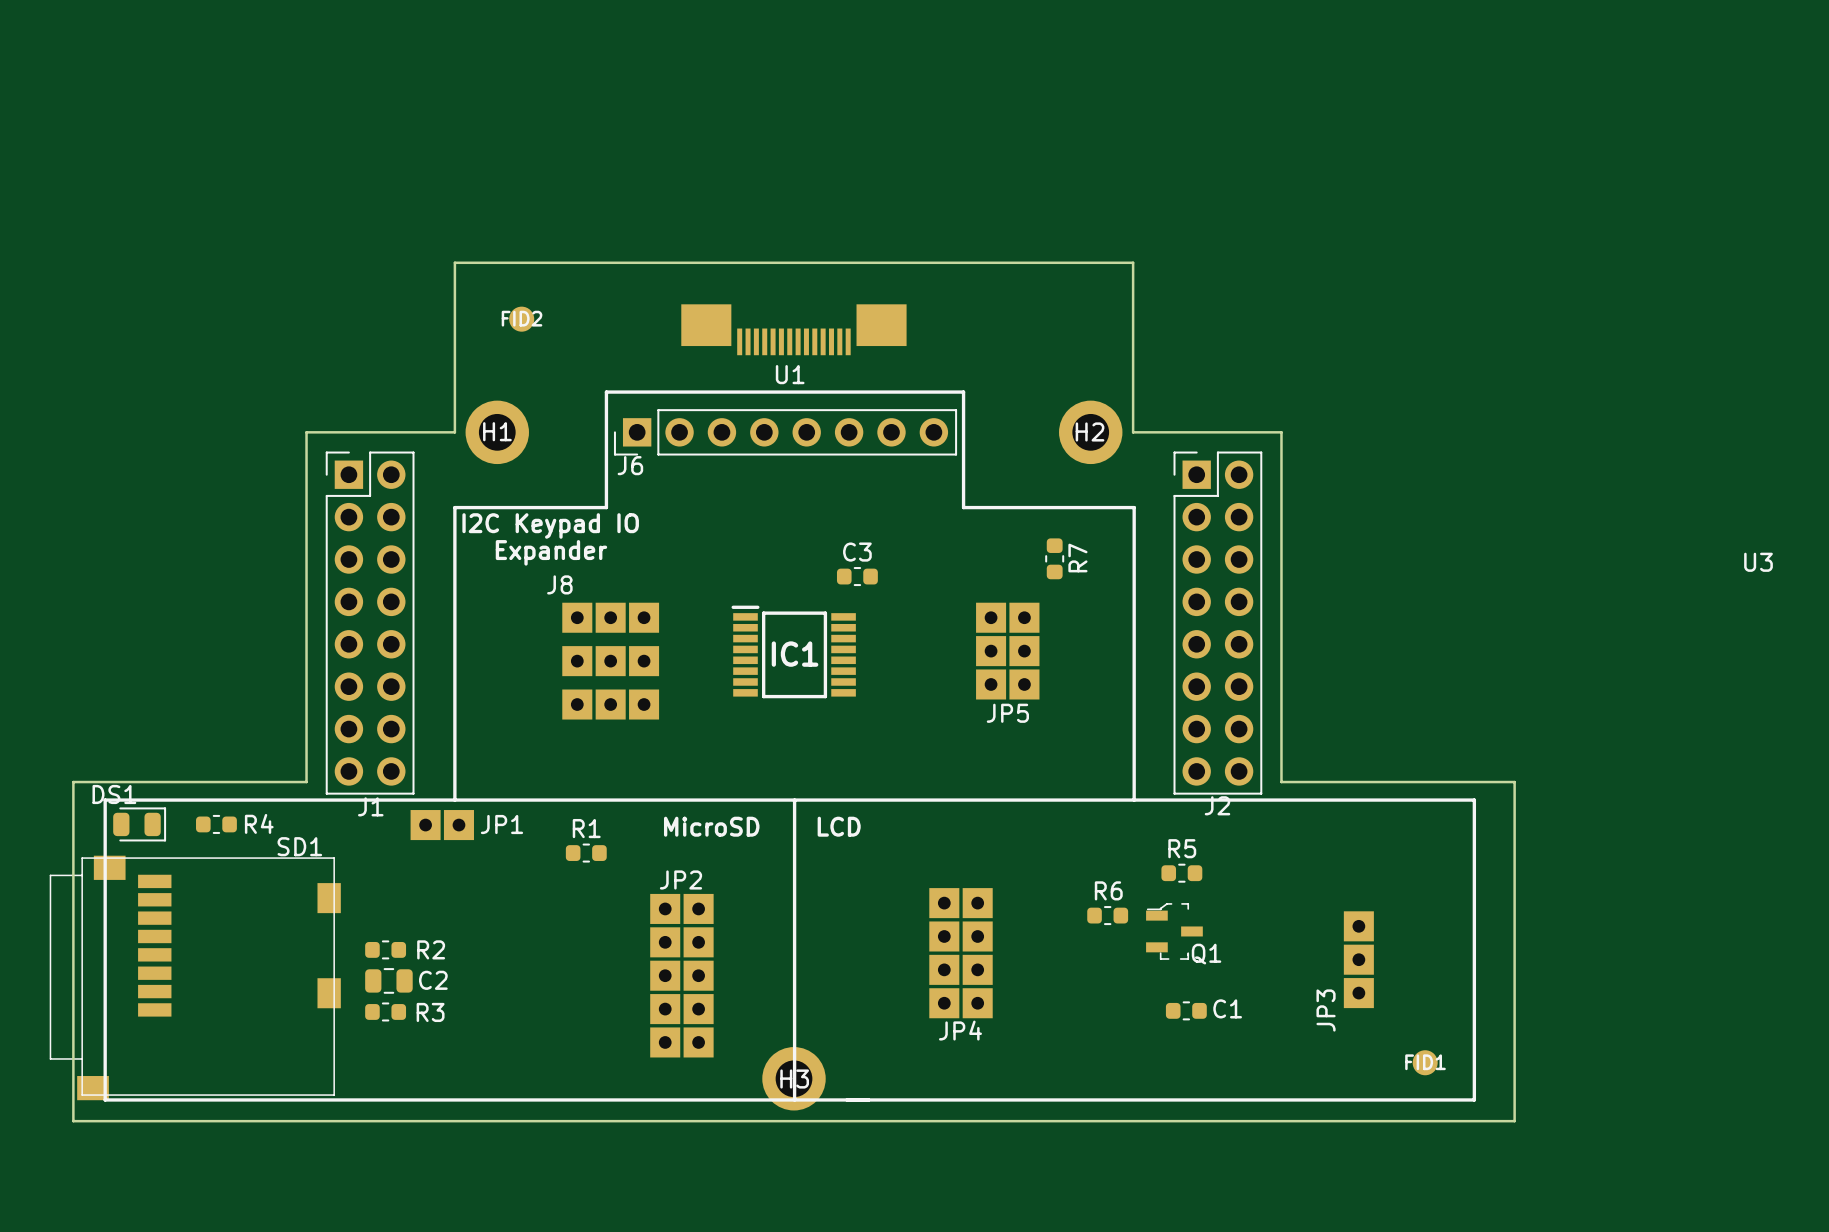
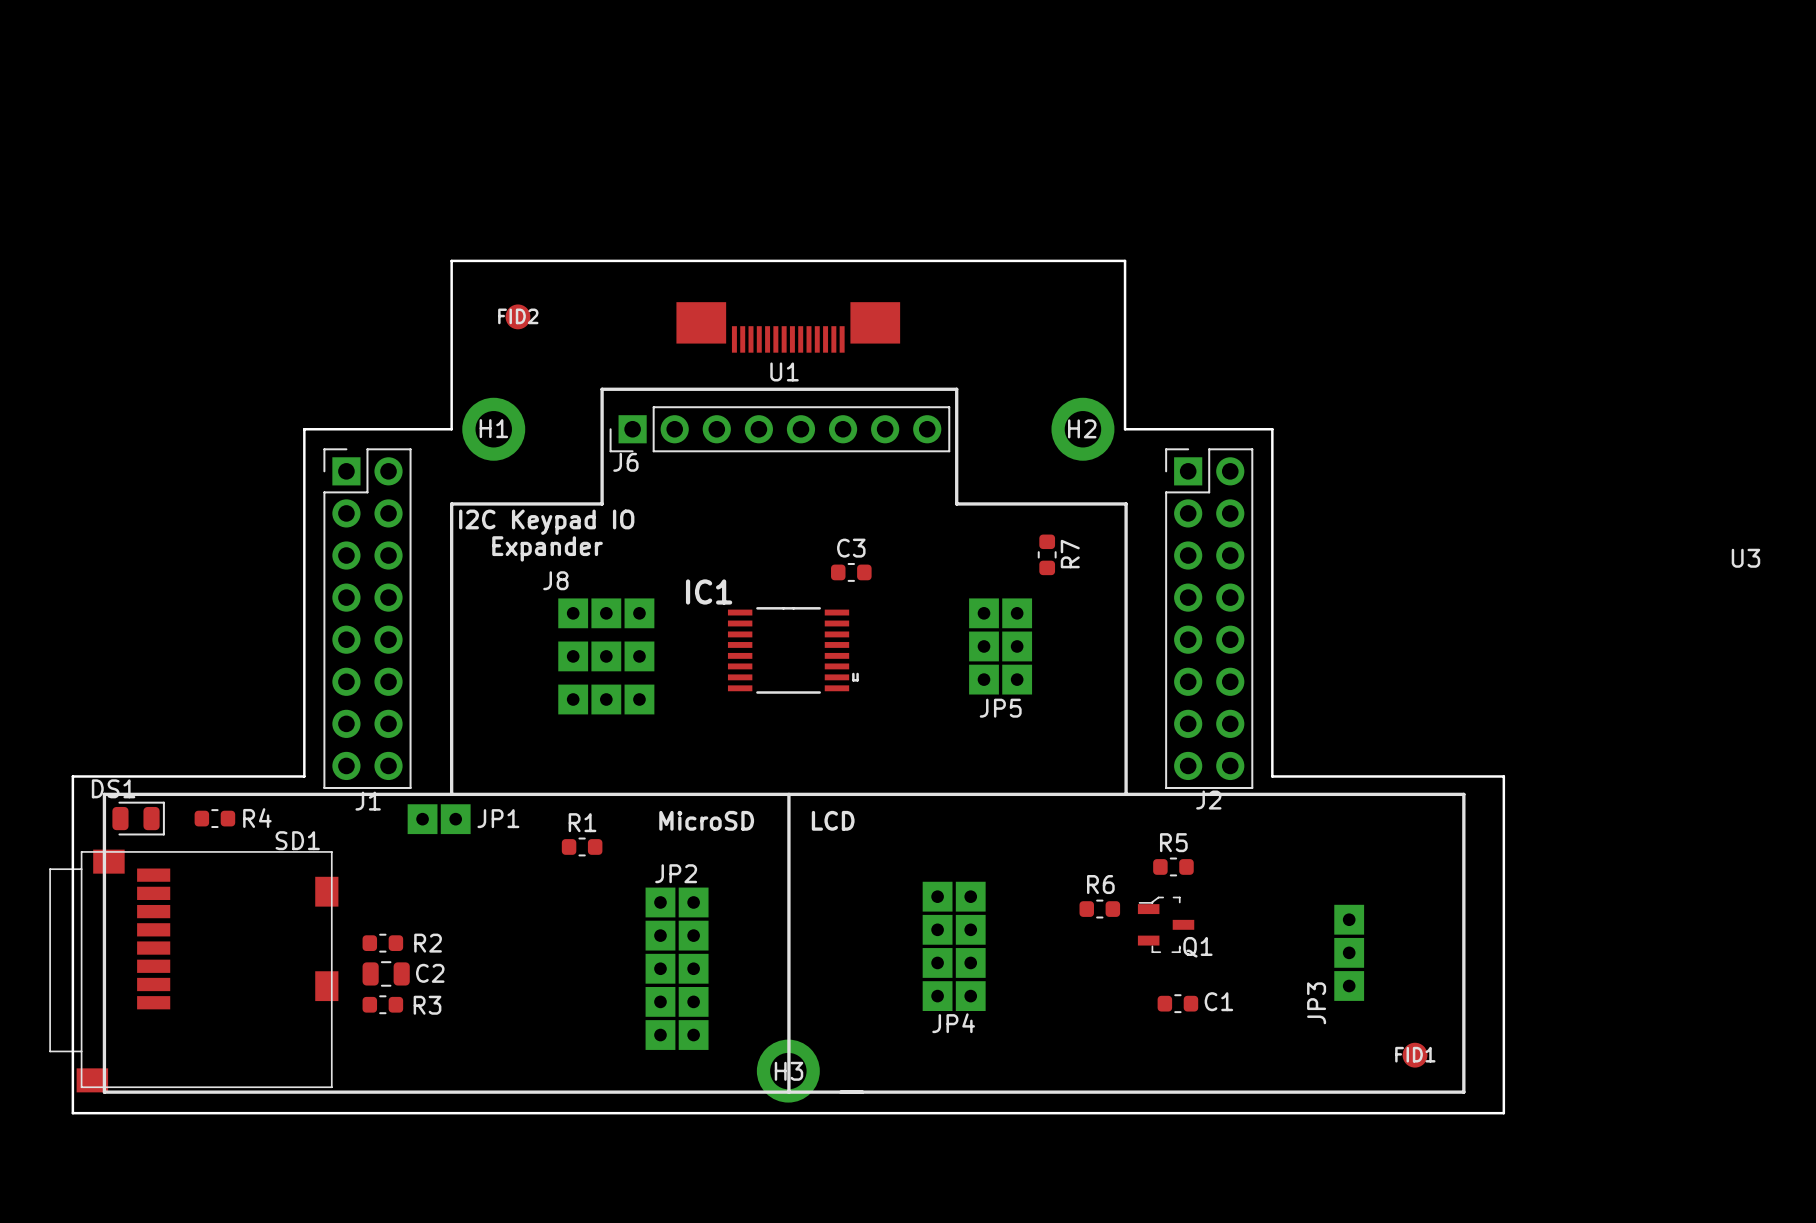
IC1 footprint: [731, 605, 856, 699] -> [727, 607, 859, 694]
IC1 name position: IC1 (795, 654) -> IC1 (709, 591)

